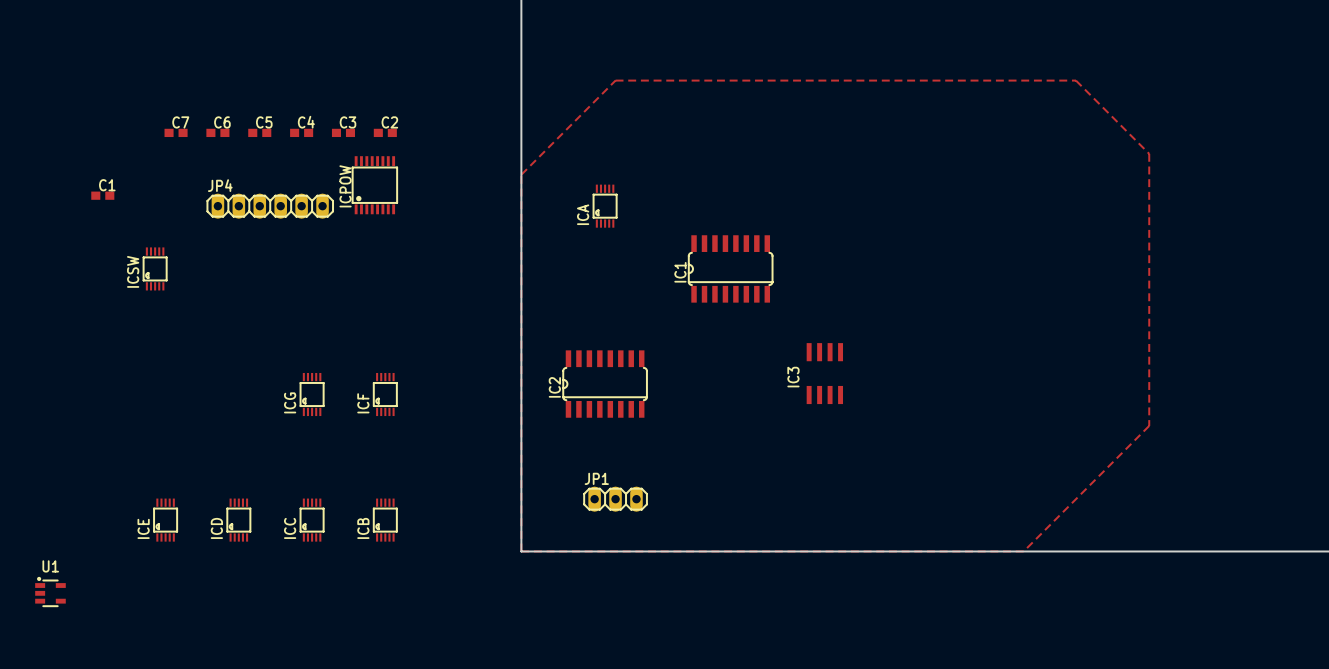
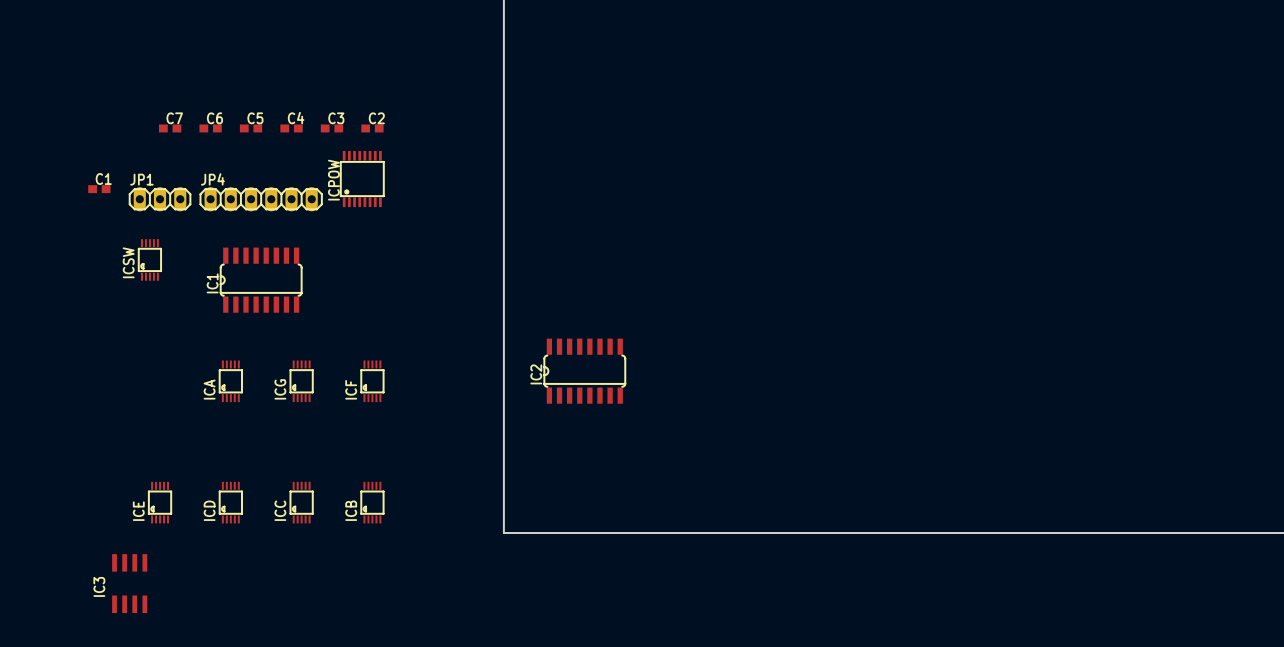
zone outline: (615, 80) (521, 174) (521, 551) (1023, 551) (1149, 425) (1149, 153) (1075, 80) (615, 80) -> none
ICA: (605, 206) -> none
IC1 position: (730, 268) -> (261, 280)
IC3 position: (824, 373) -> (129, 583)
ICA: none -> (230, 381)
JP1 position: (615, 499) -> (160, 199)
U1: (50, 591) -> none

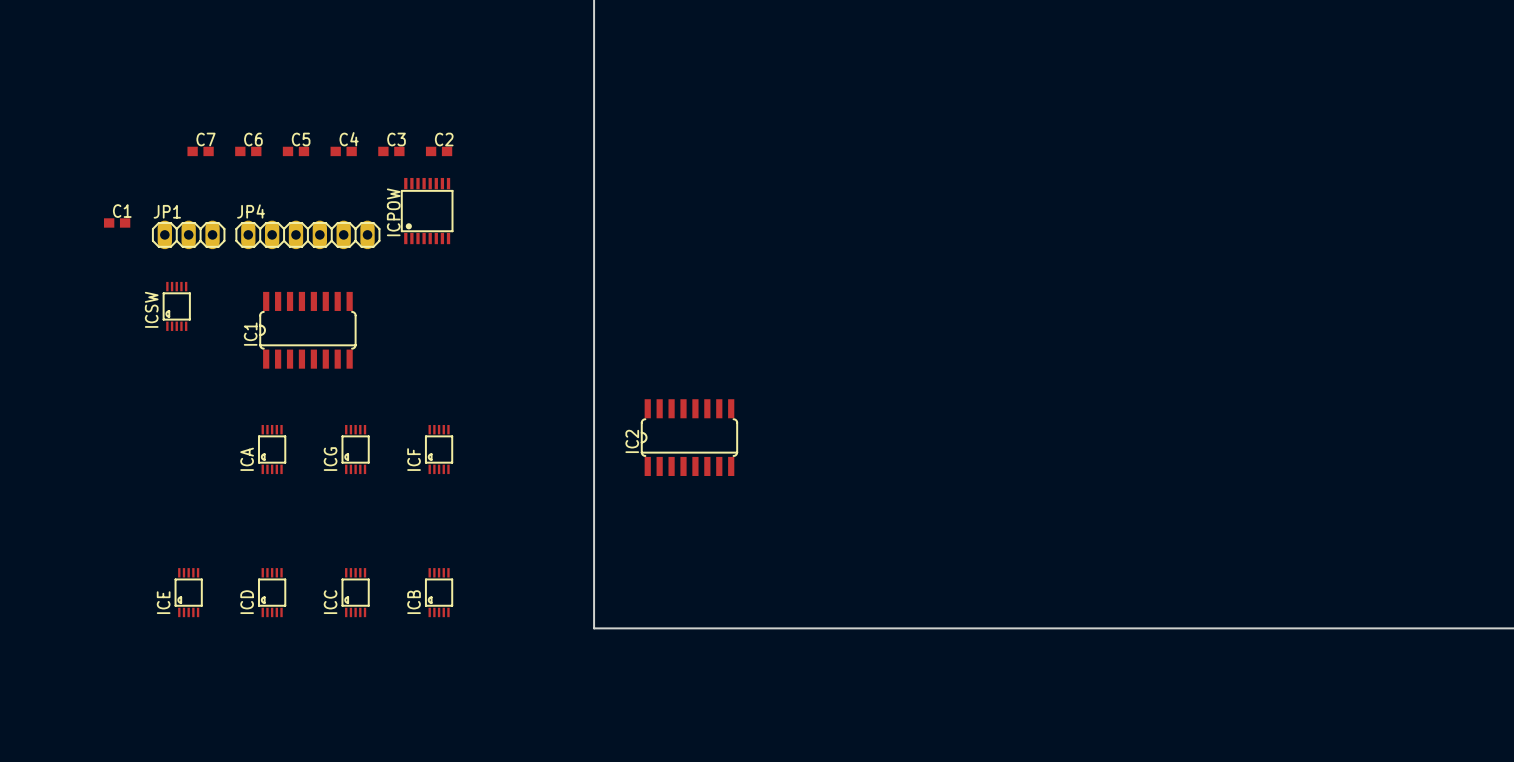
IC3: (129, 583) -> none

